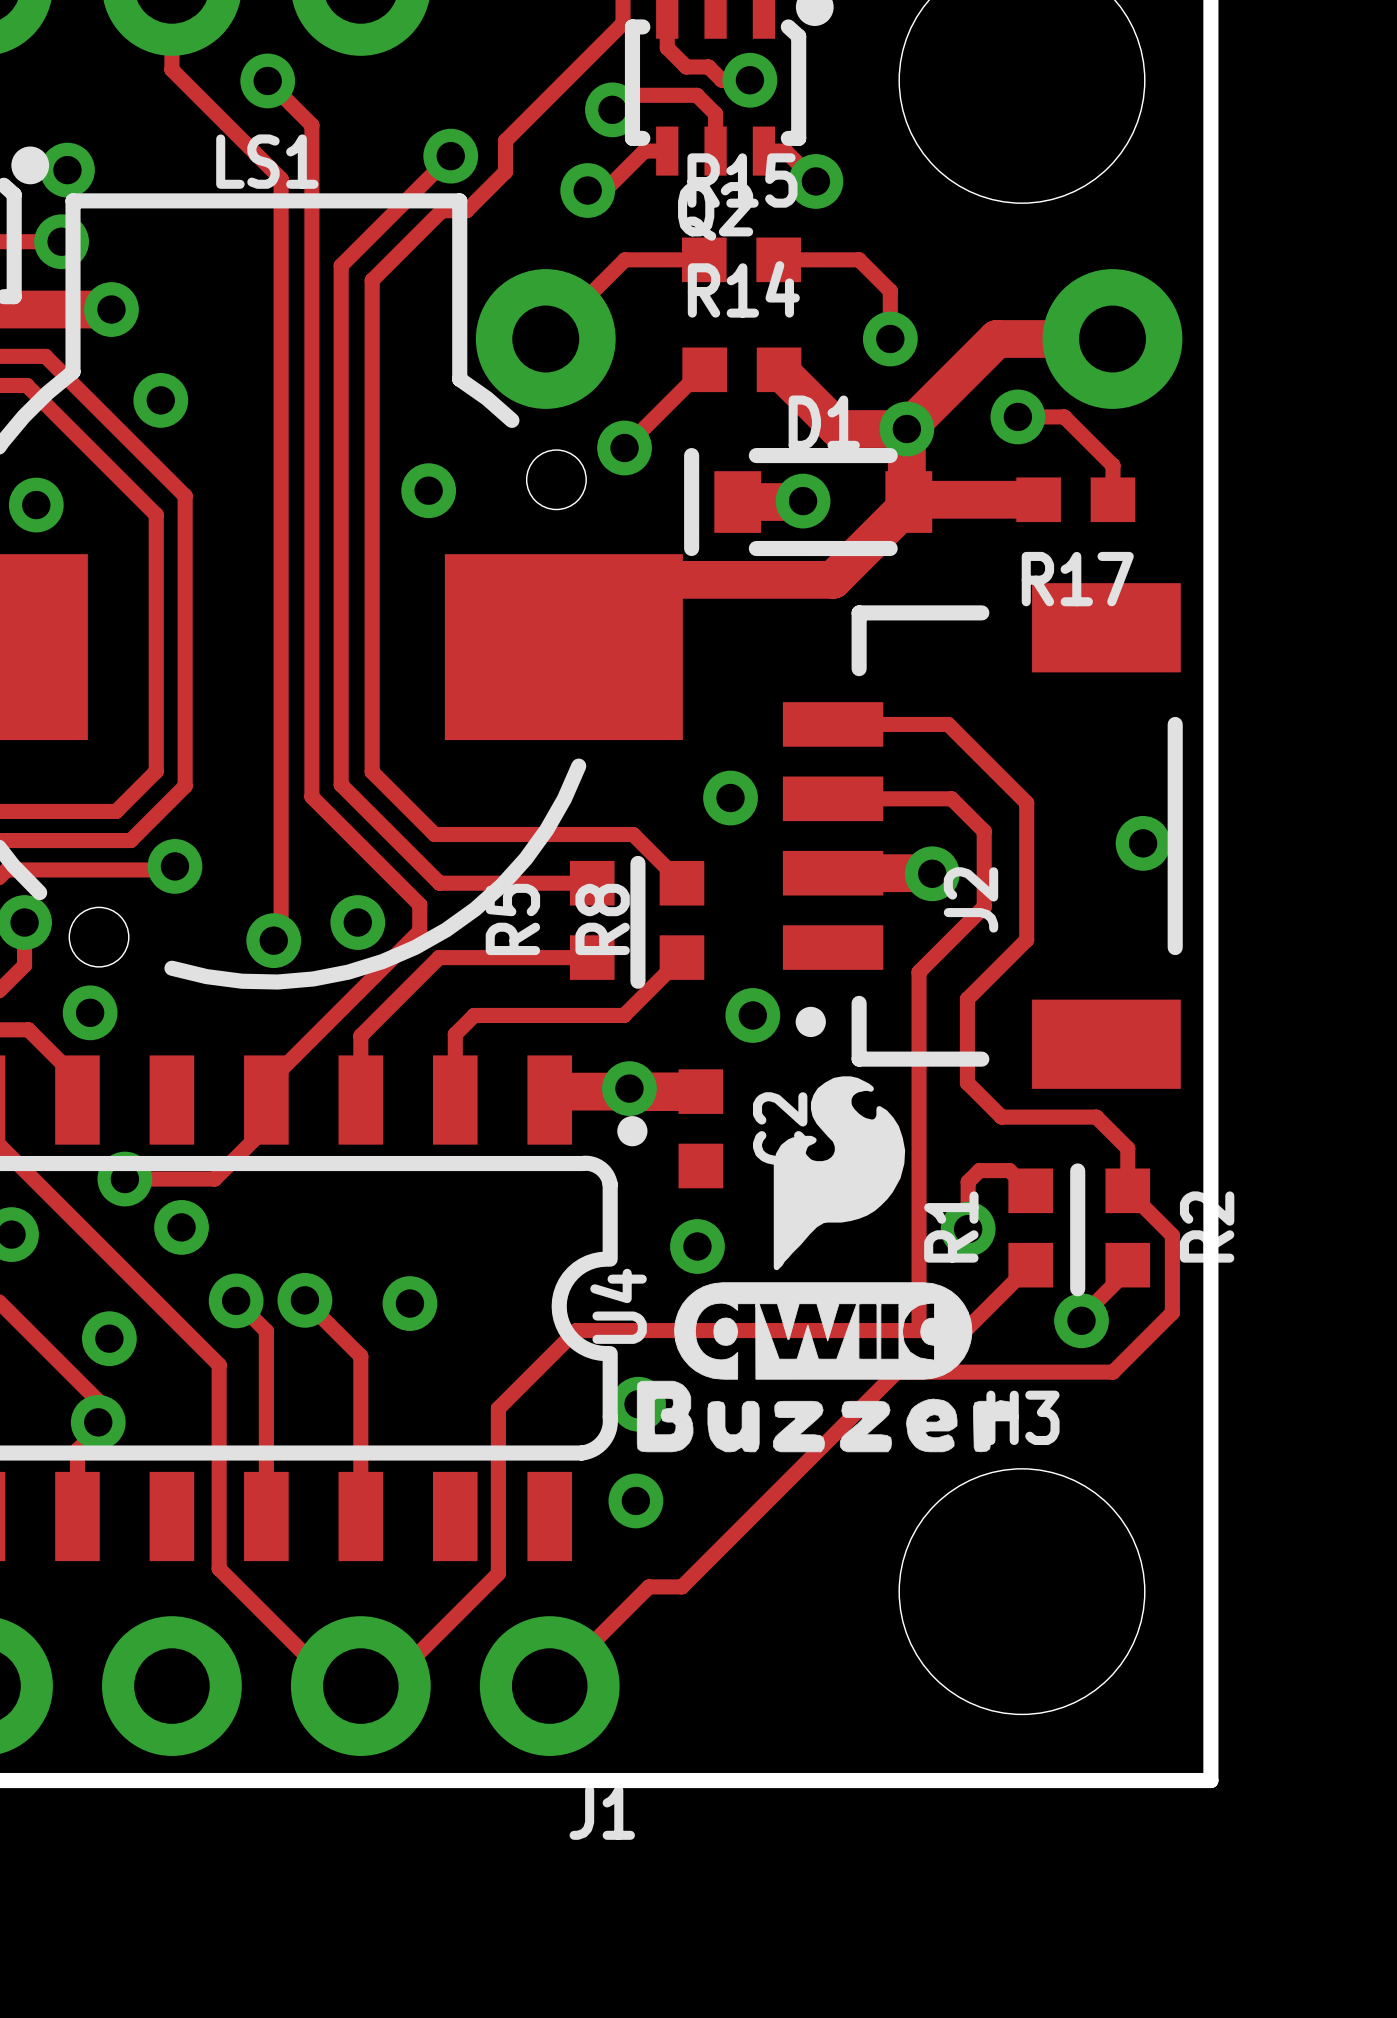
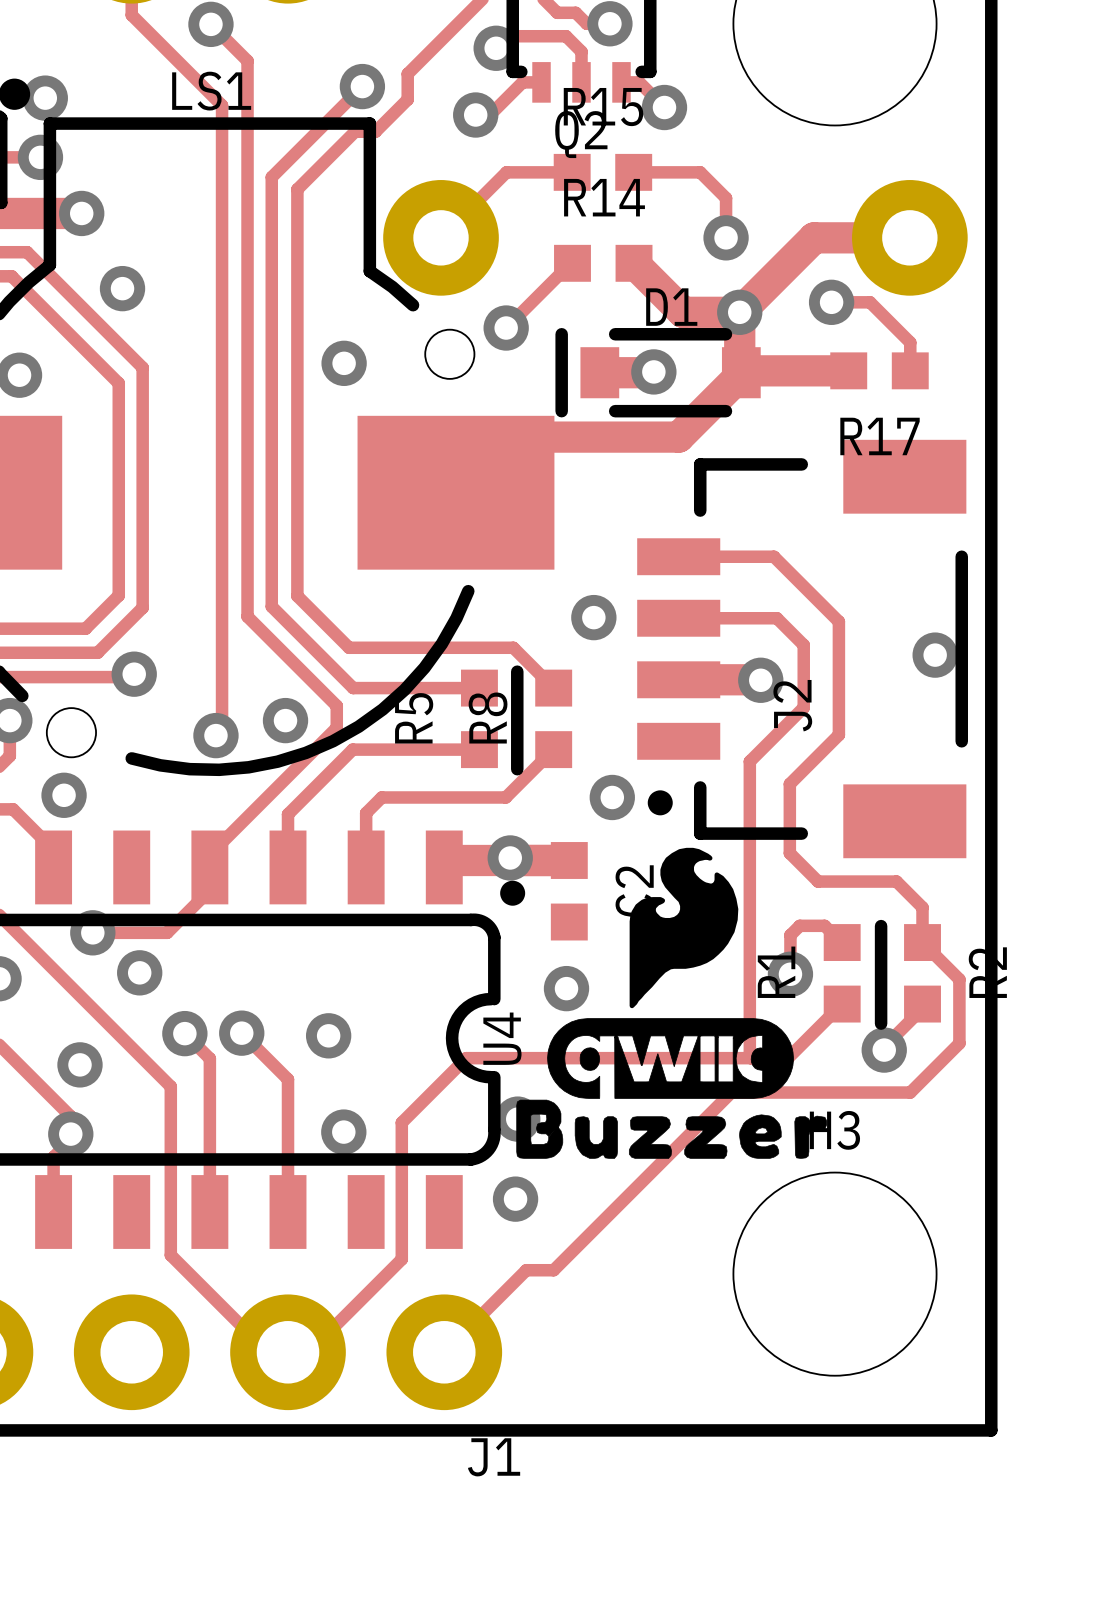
via: none -> (343, 1132)

